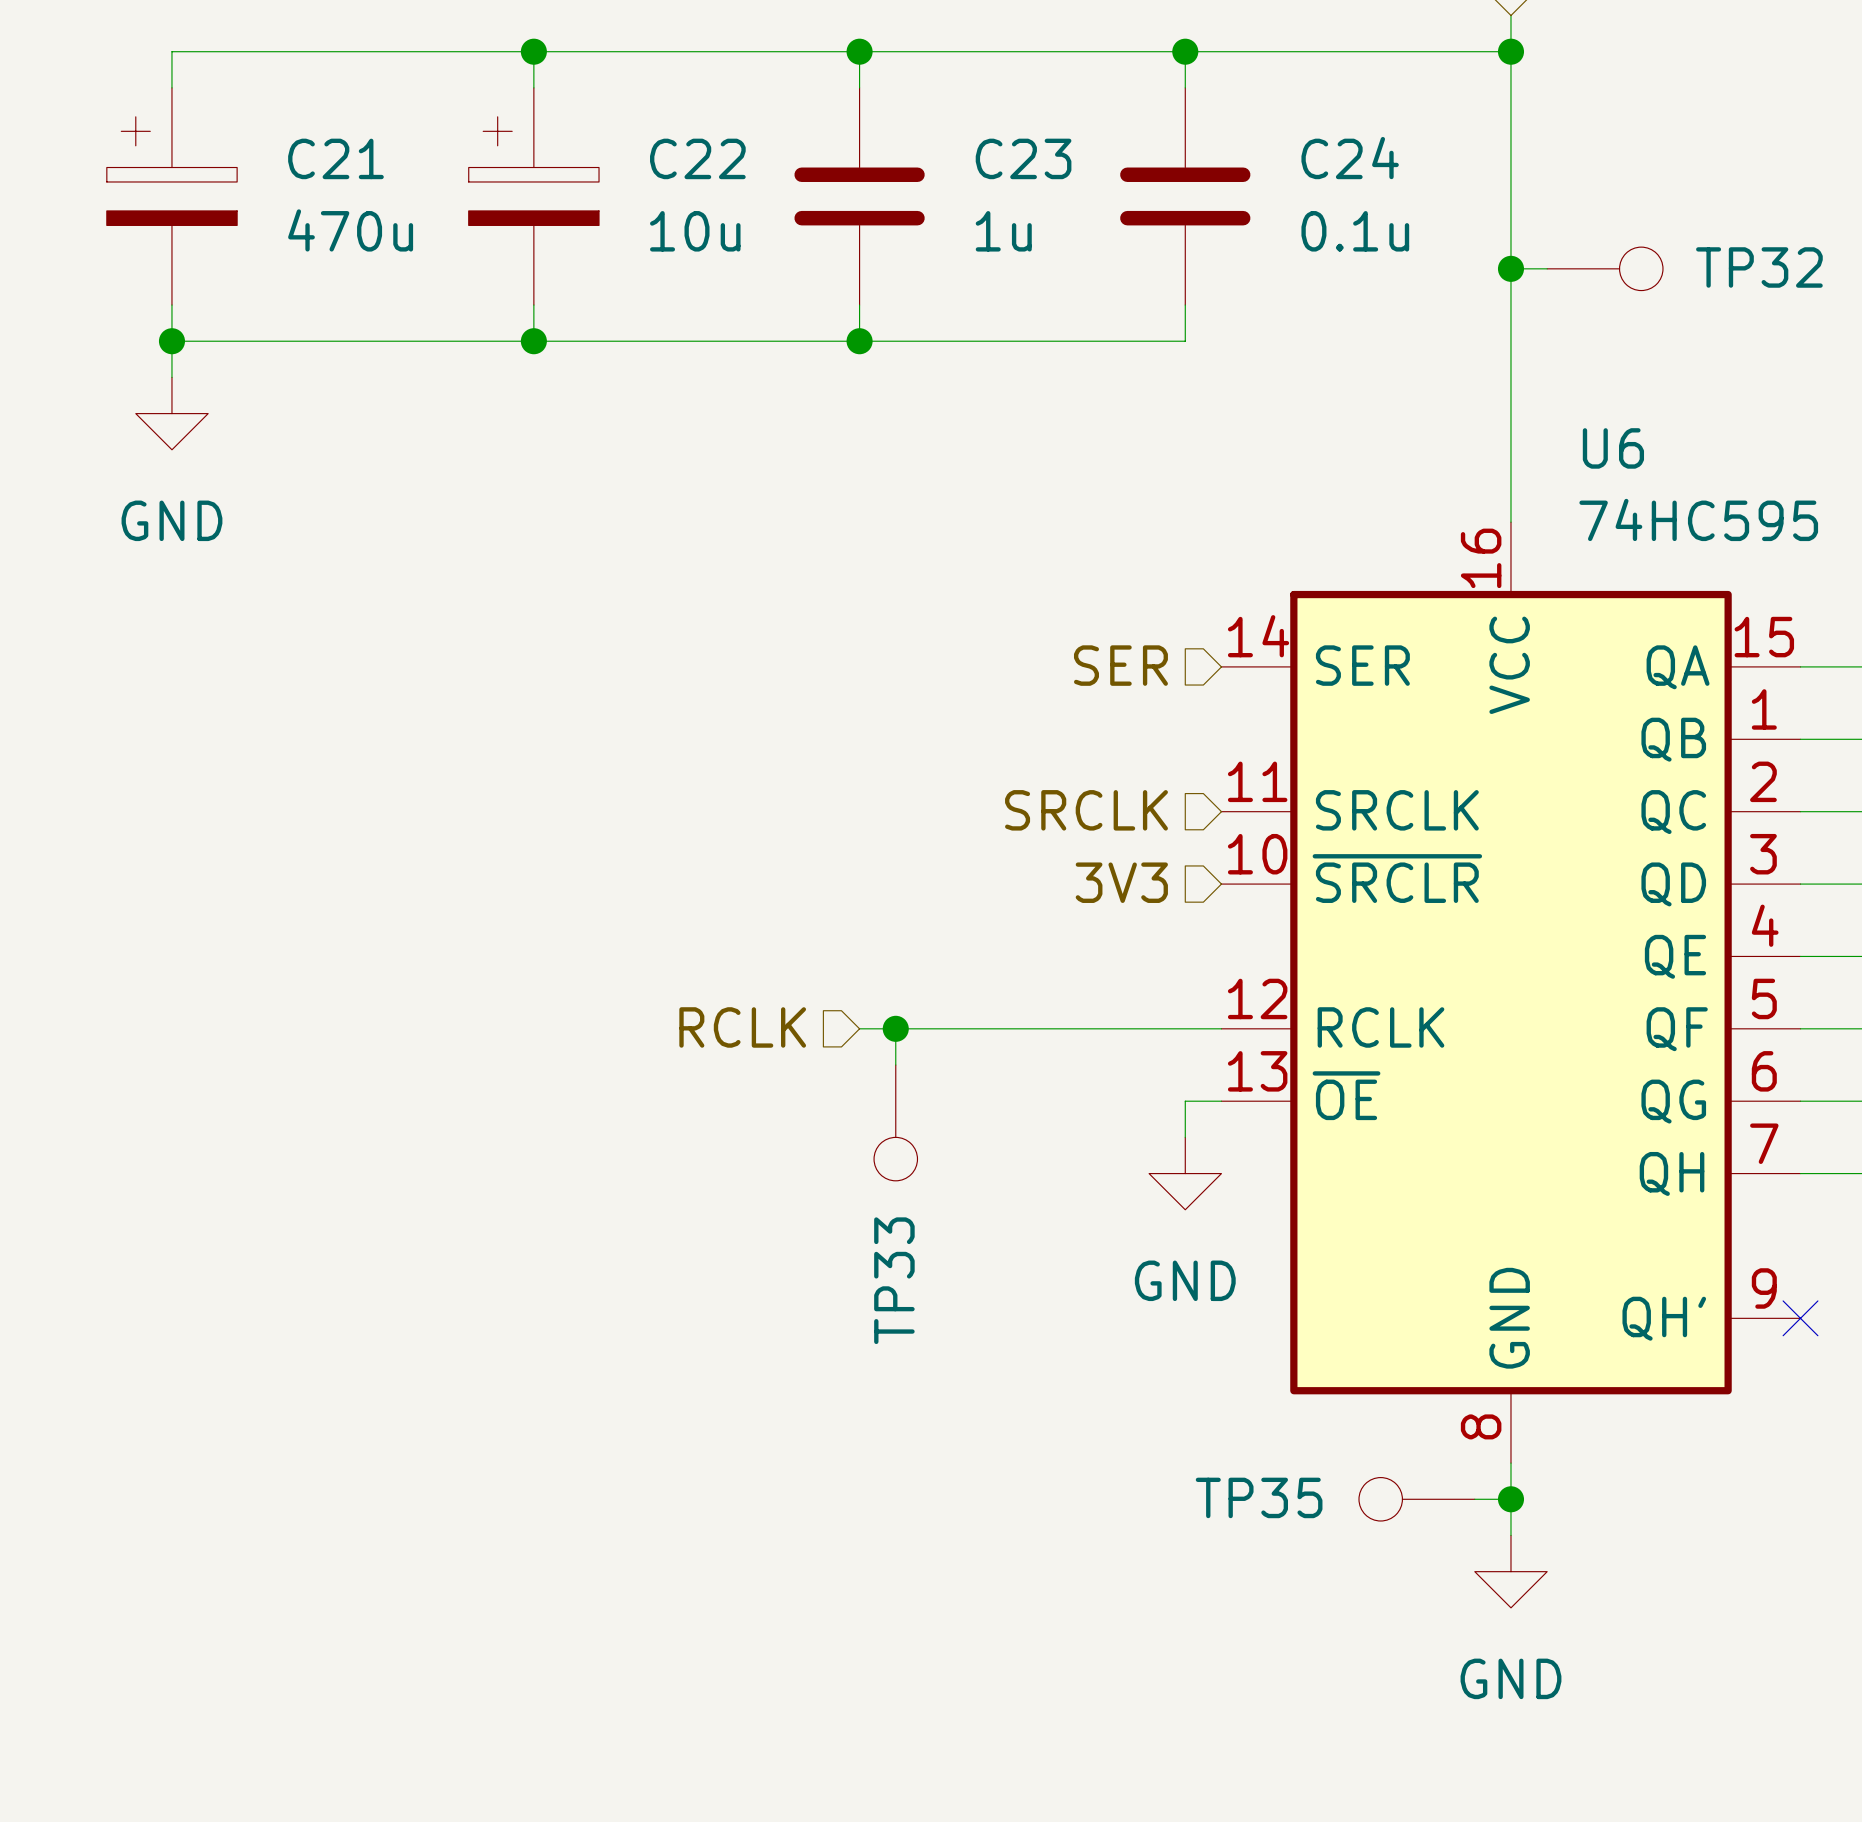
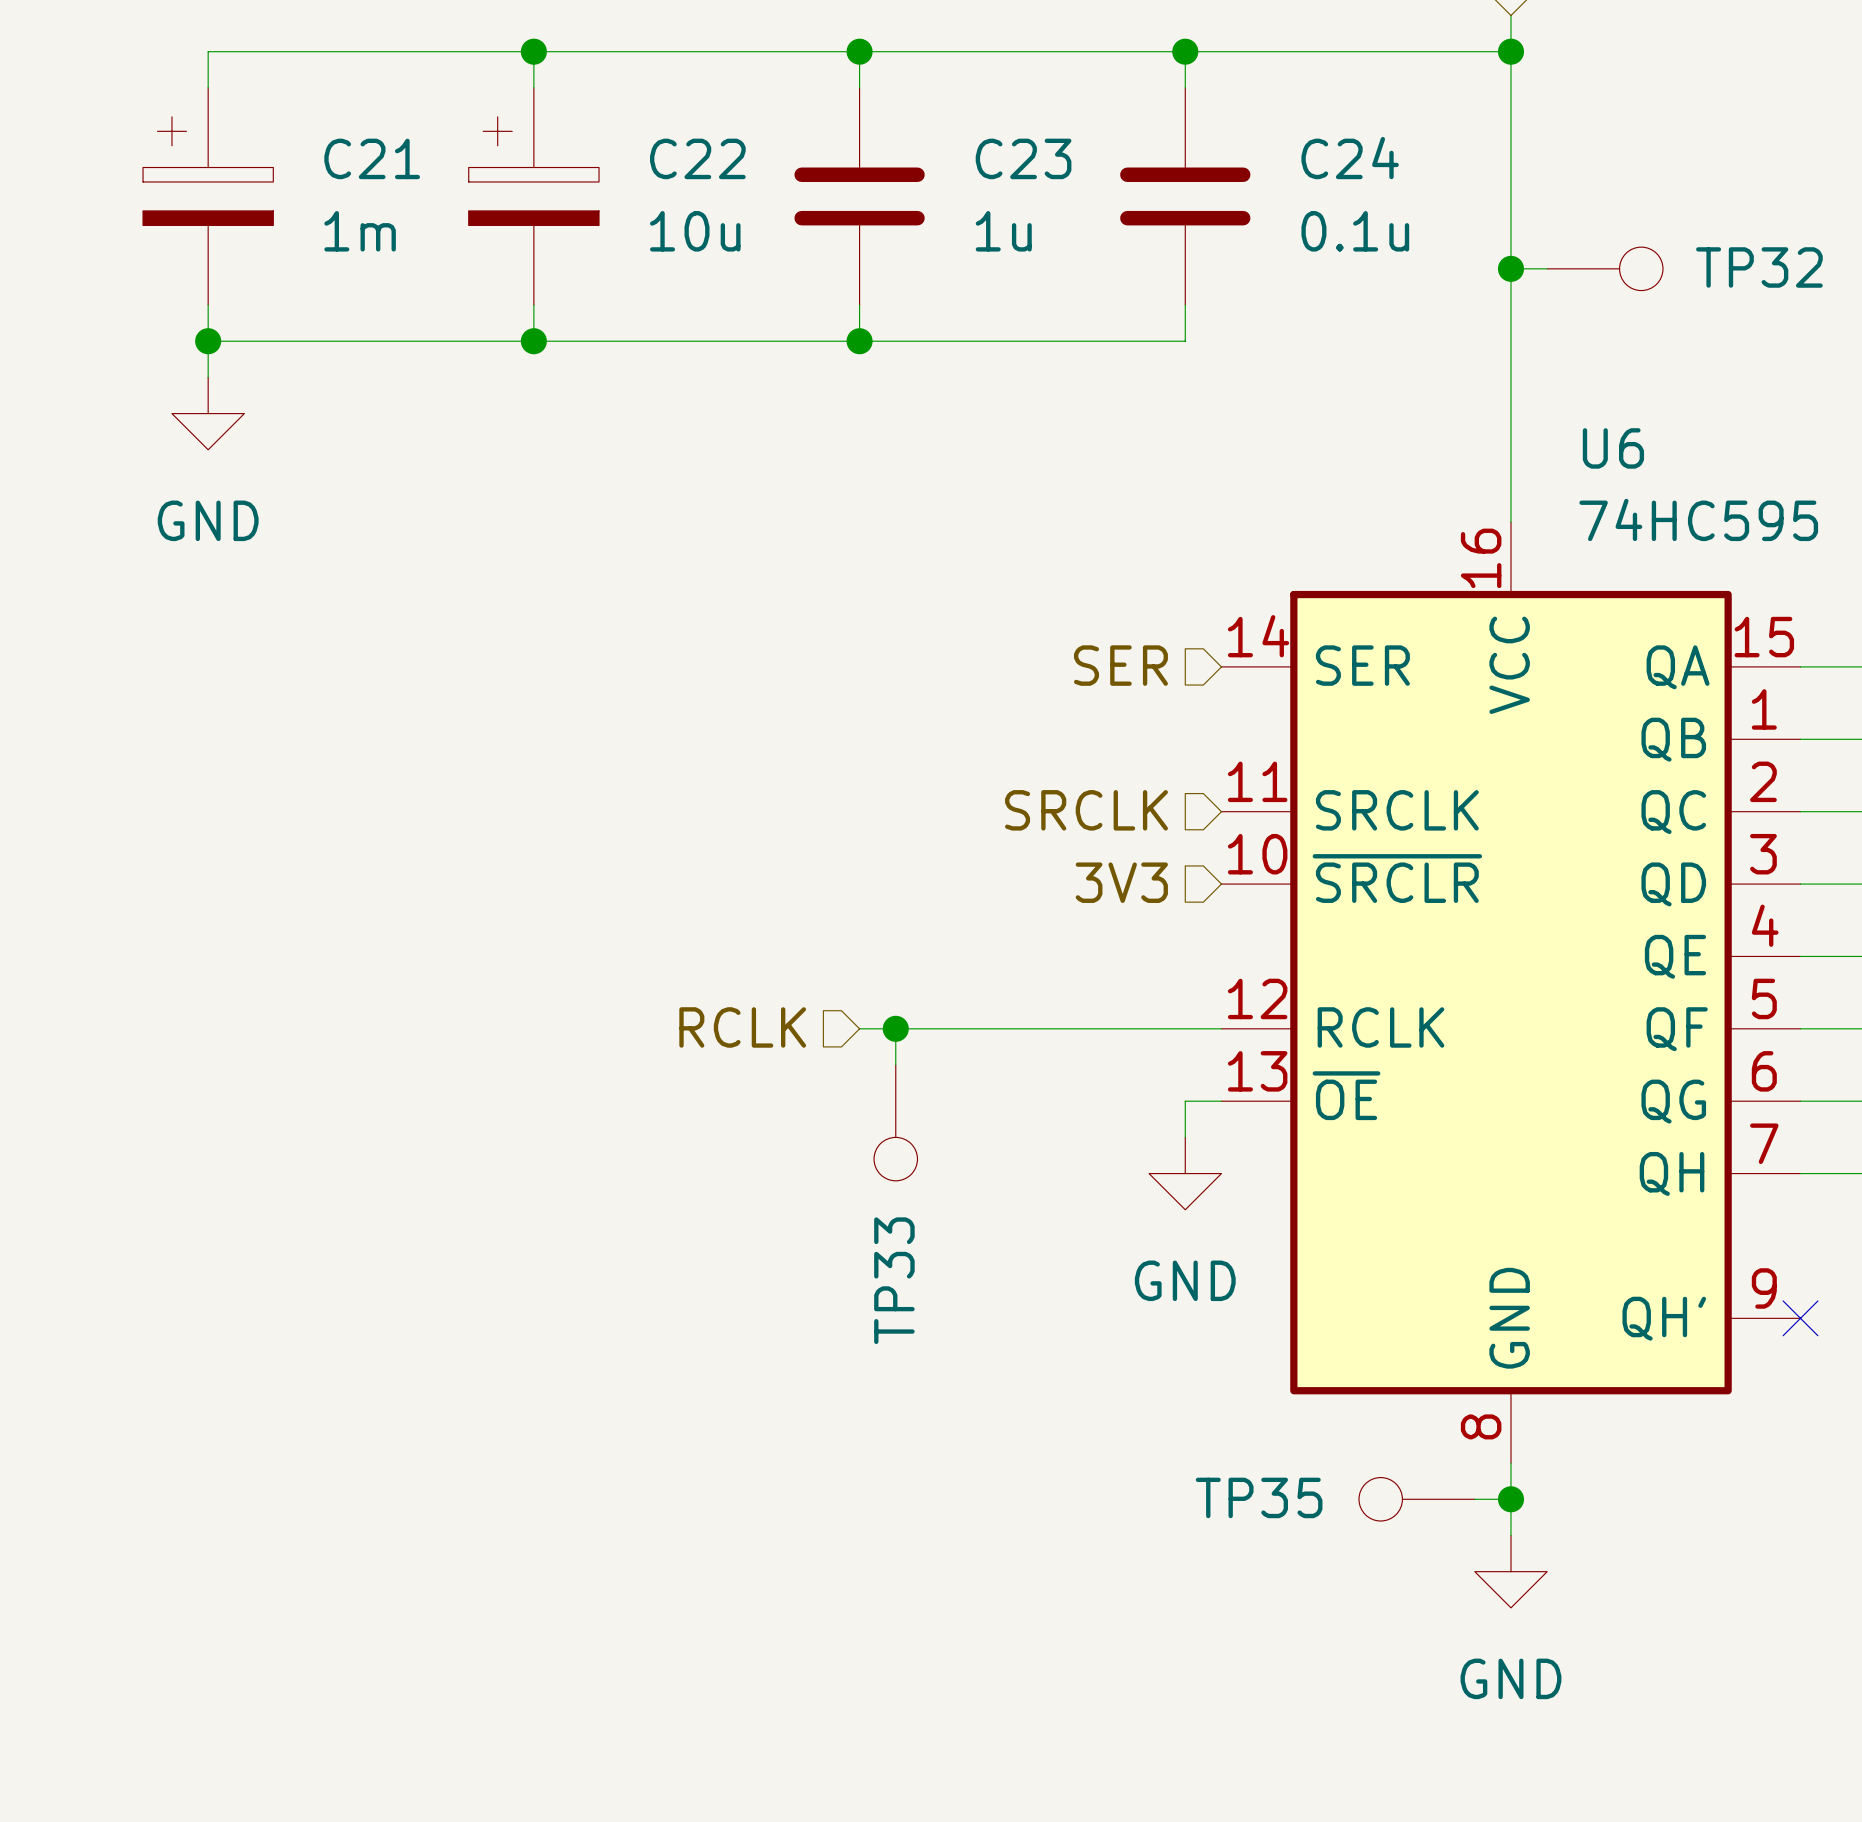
wire: (208, 51) (171, 51) (171, 87) -> (208, 51) (208, 87)
C21 position: (171, 196) -> (208, 196)
C21 value: 470u (350, 230) -> 1m (360, 231)
wire: (171, 305) (171, 377) -> (208, 305) (208, 377)
wire: (171, 341) (208, 341) -> none
junction position: (171, 341) -> (208, 341)
power symbol position: GND (171, 413) -> GND (208, 413)

